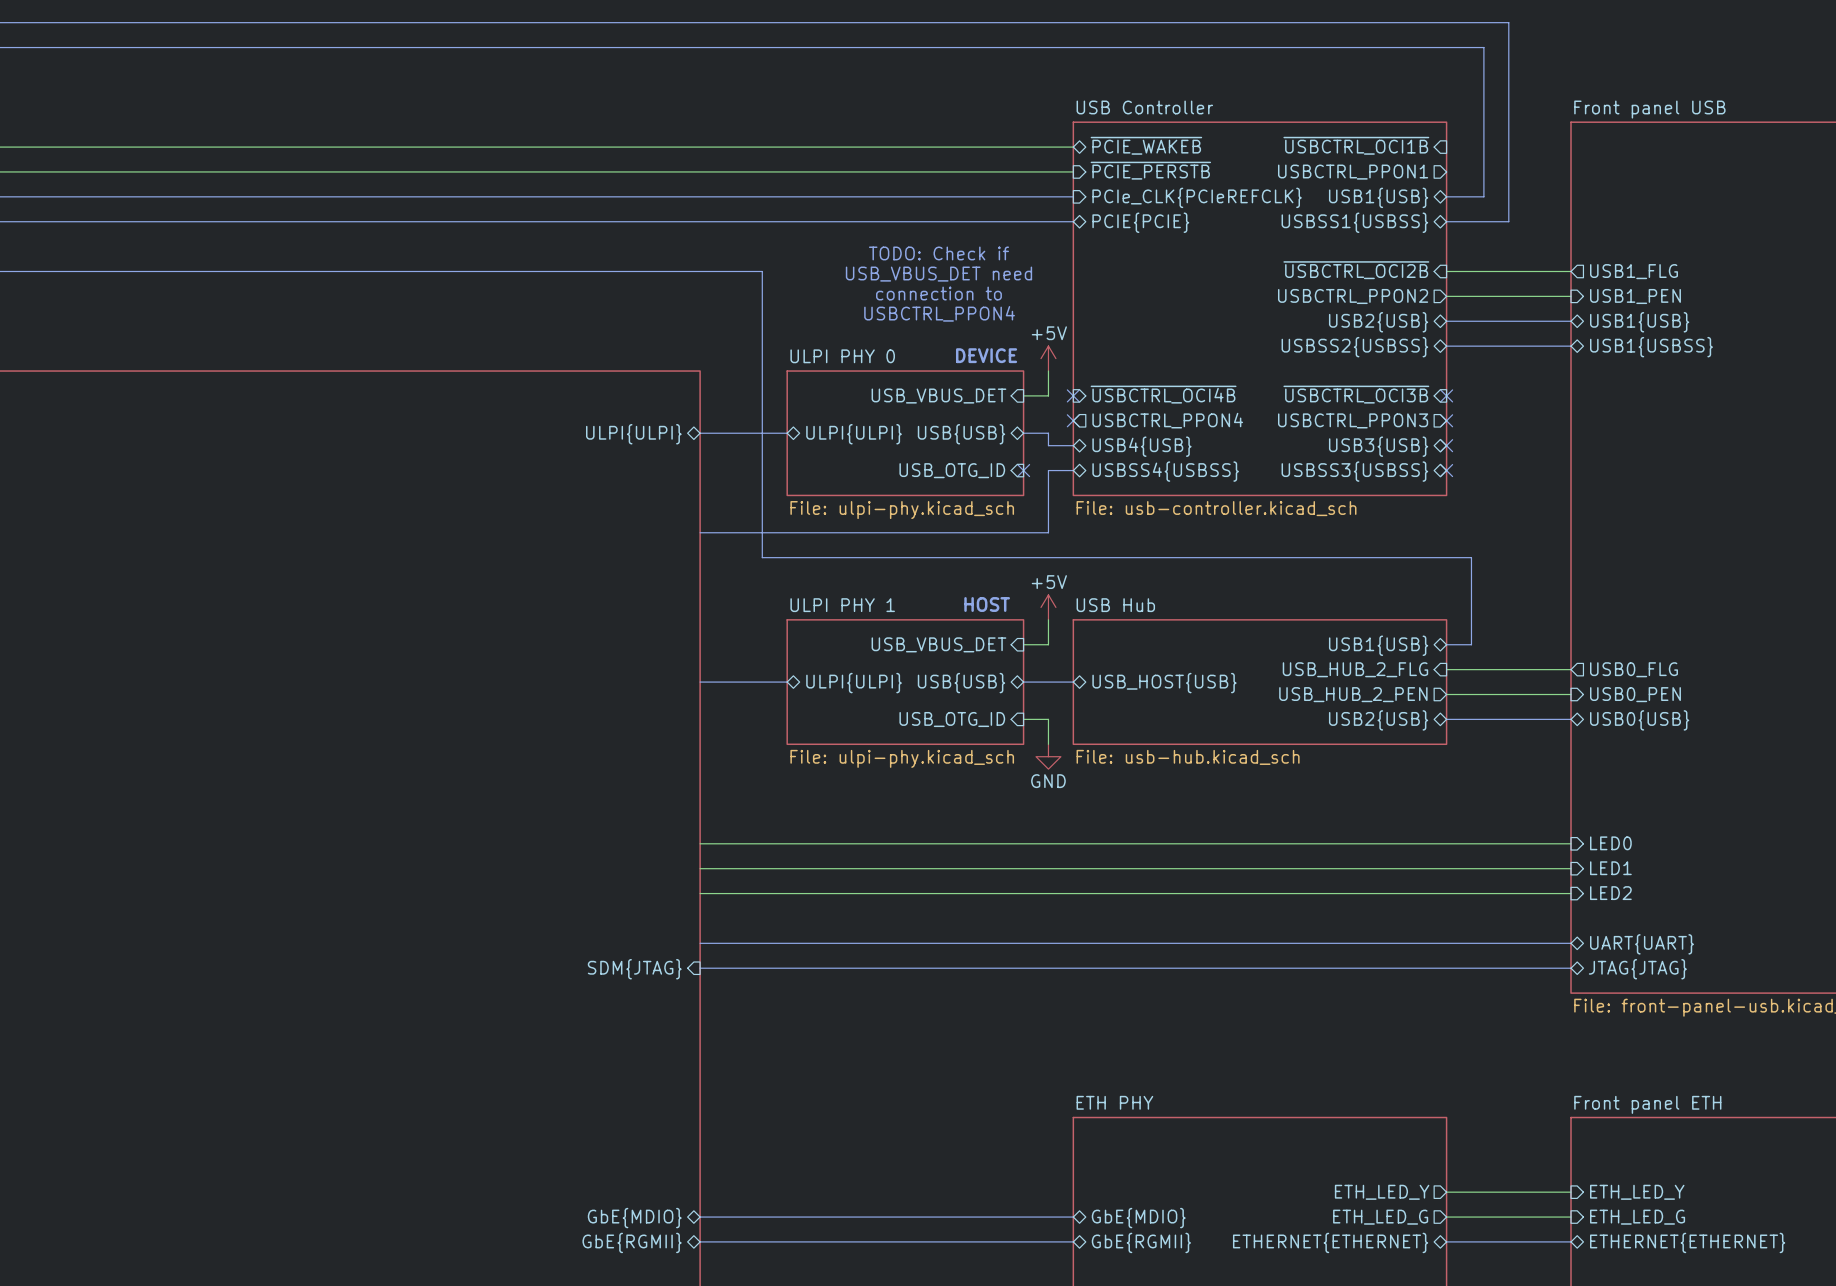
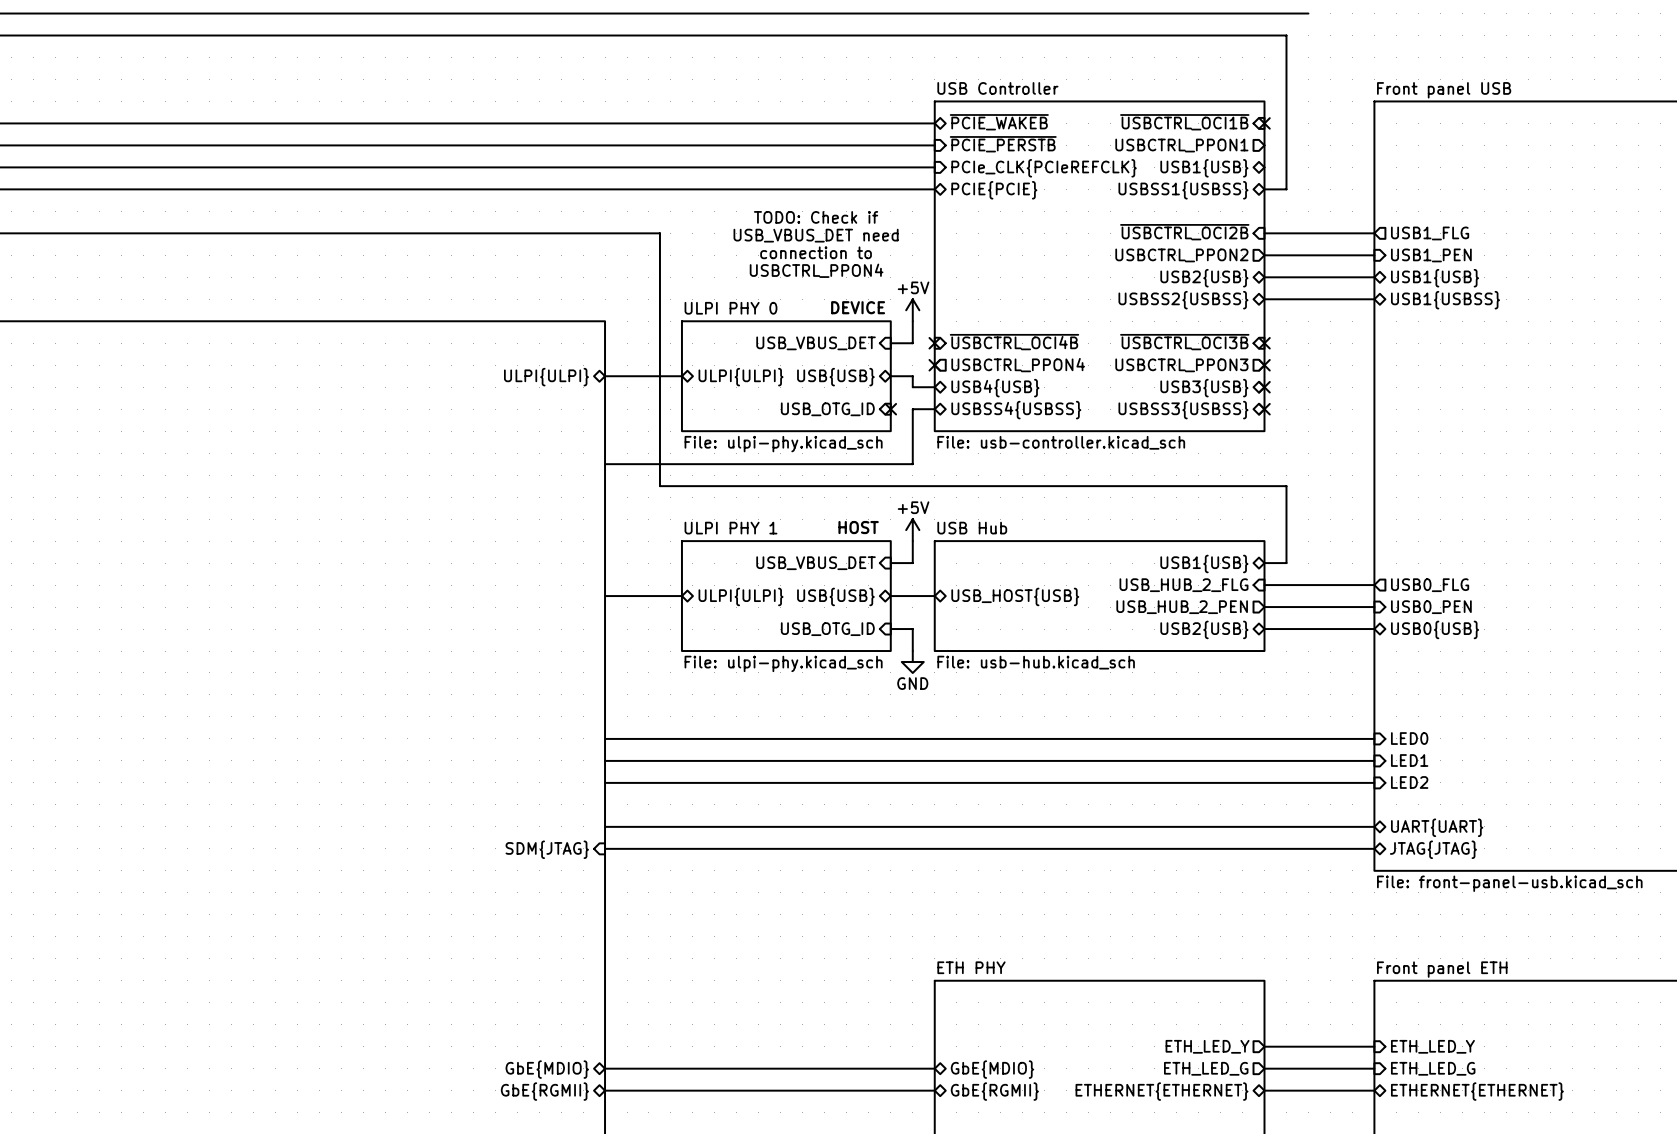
bus: (1496, 22) (1508, 22) (1508, 221) (1471, 221) -> (1286, 35) (1286, 189)
bus: (1471, 47) (1483, 47) (1483, 196) (1446, 196) -> none
no-connect mark: none -> (1264, 123)

